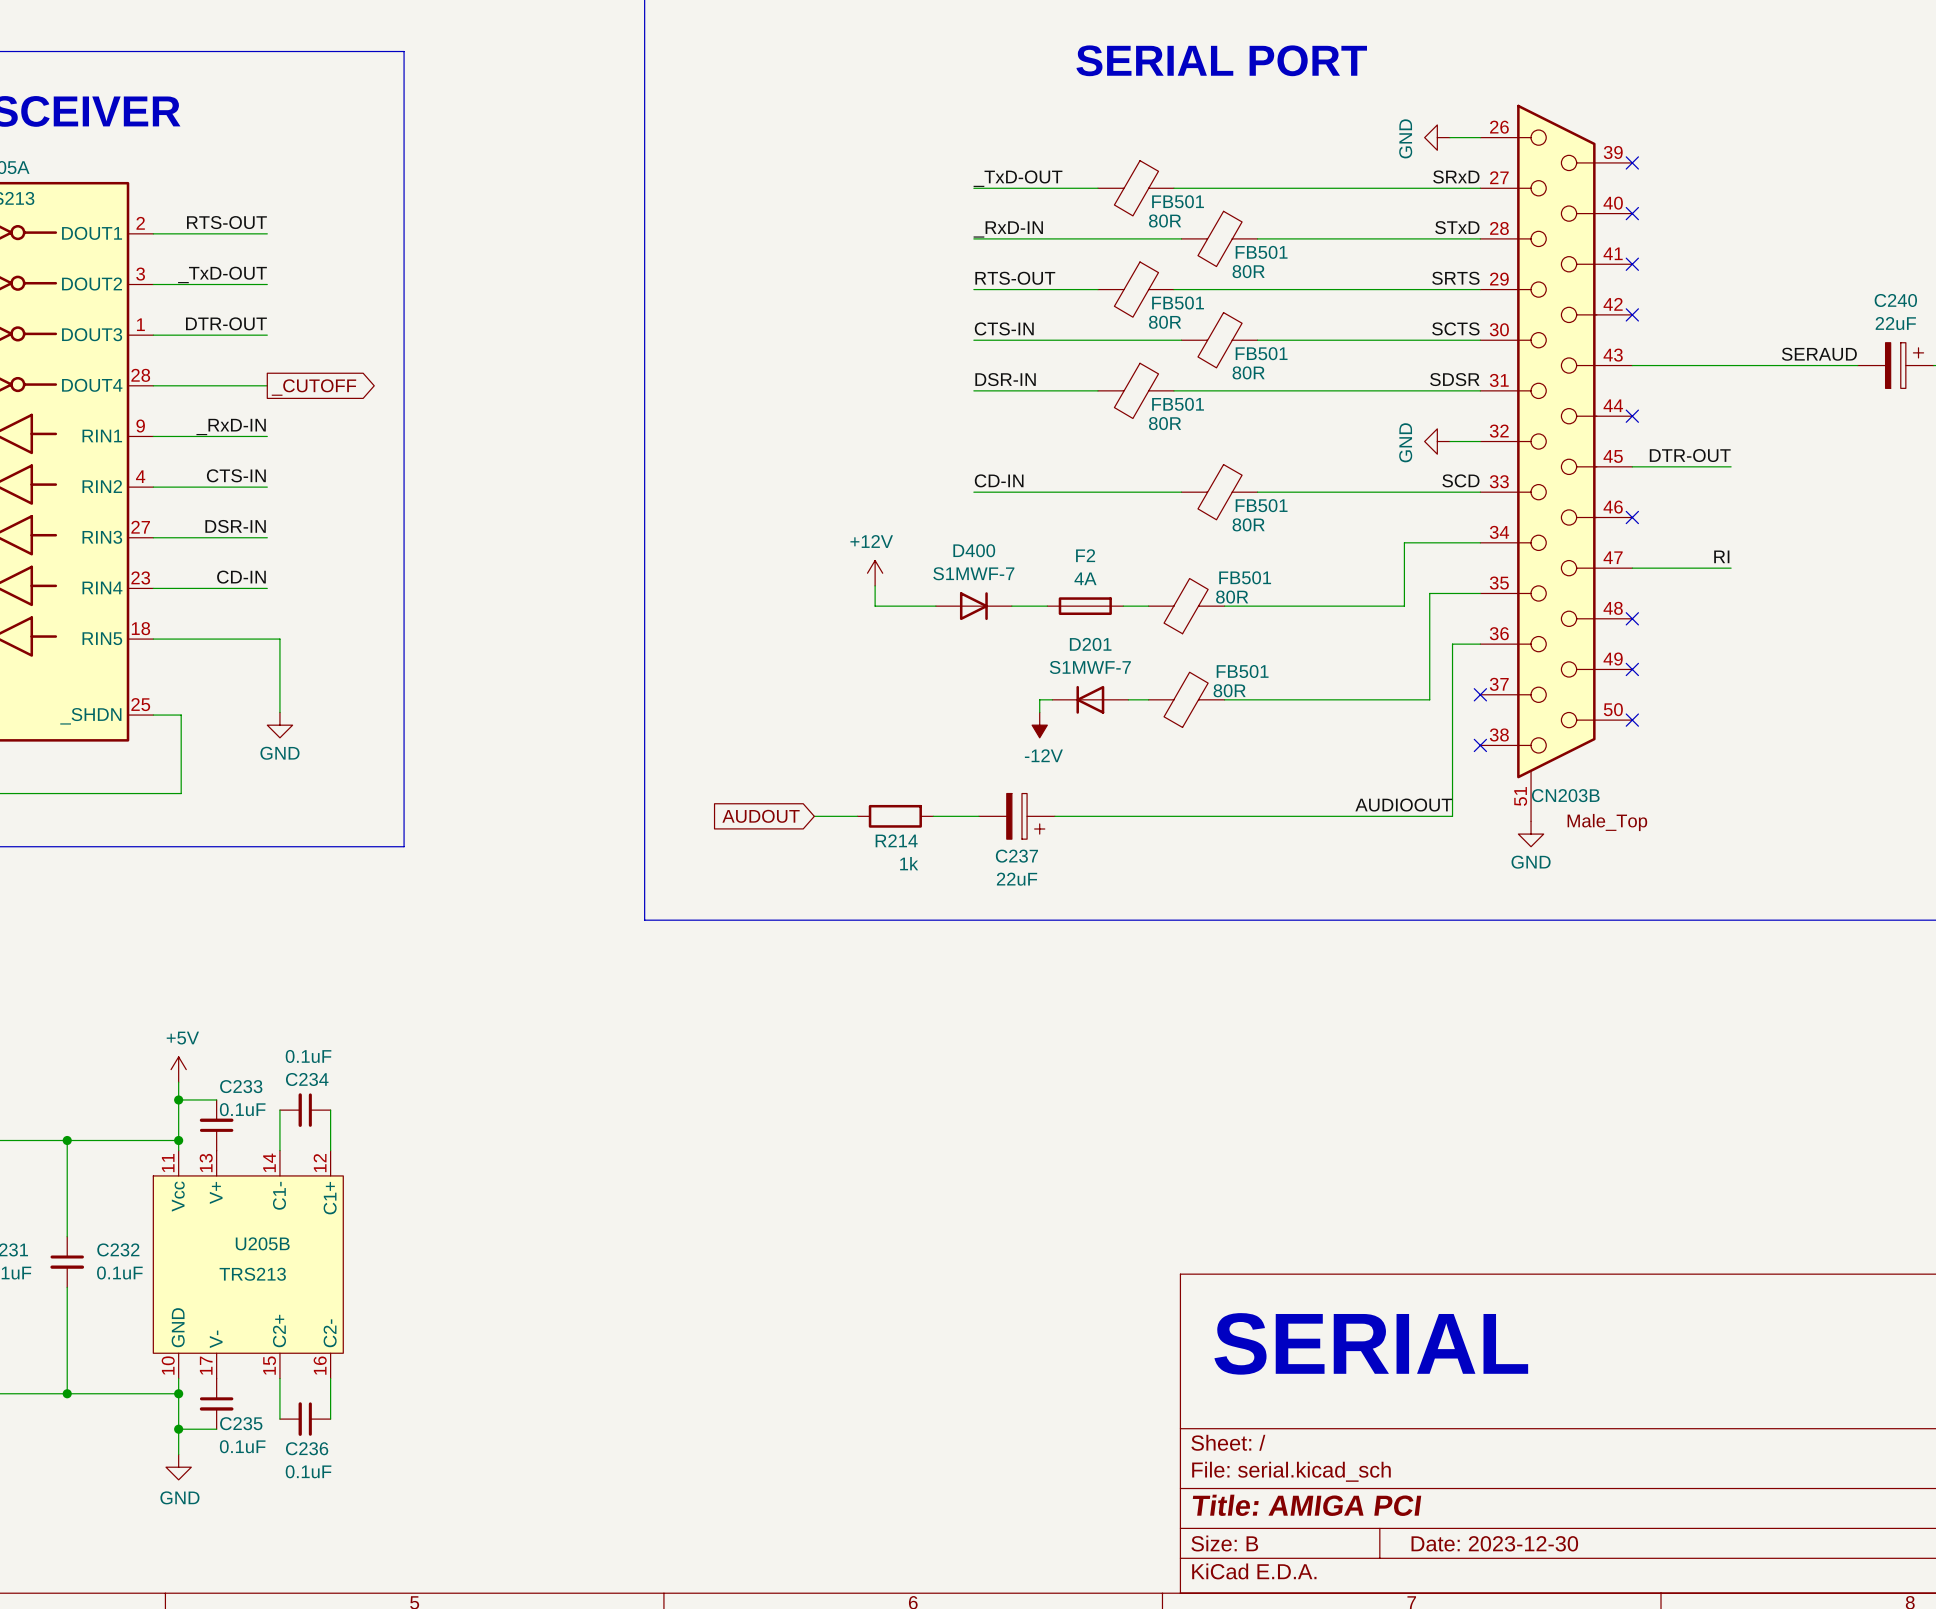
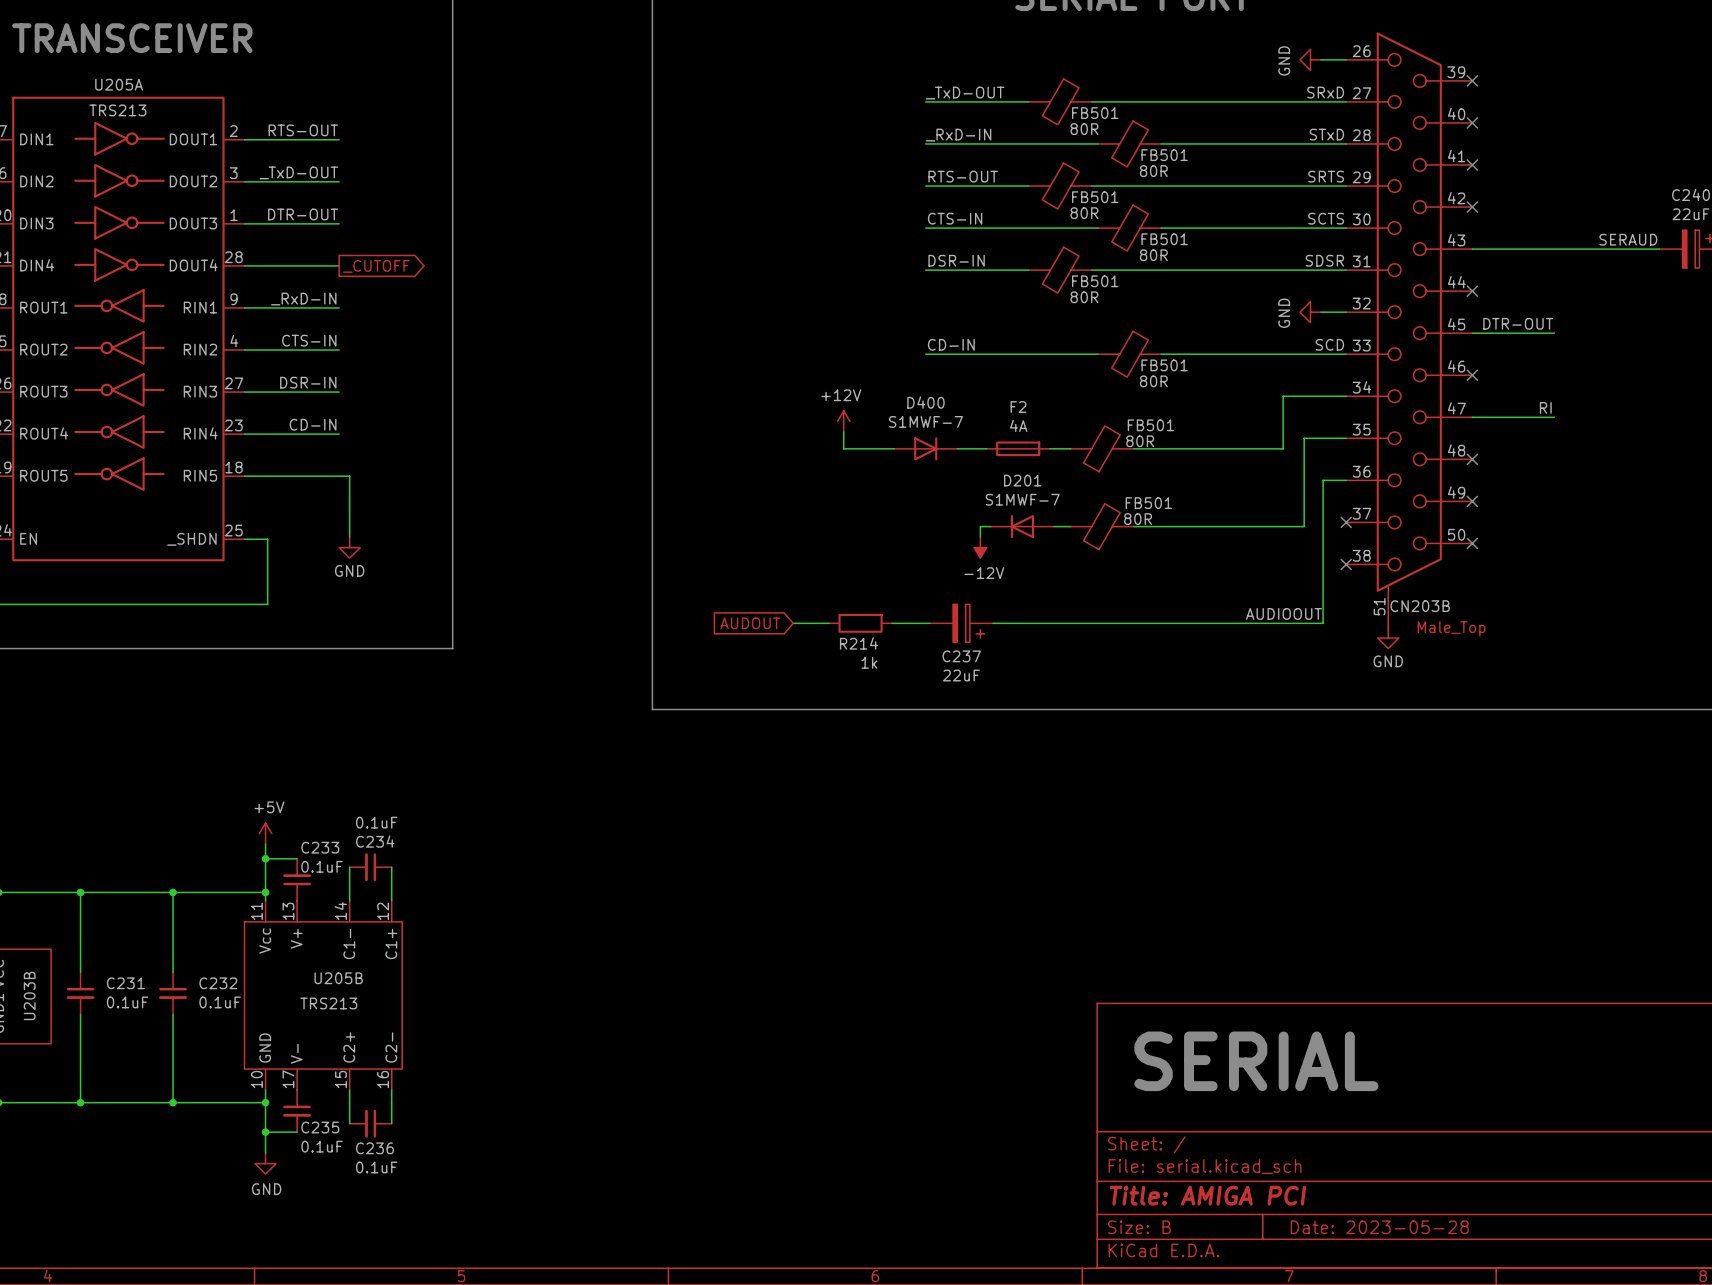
title block: Date: 2023-12-30 (1494, 1543) -> Date: 2023-05-28 (1379, 1227)

